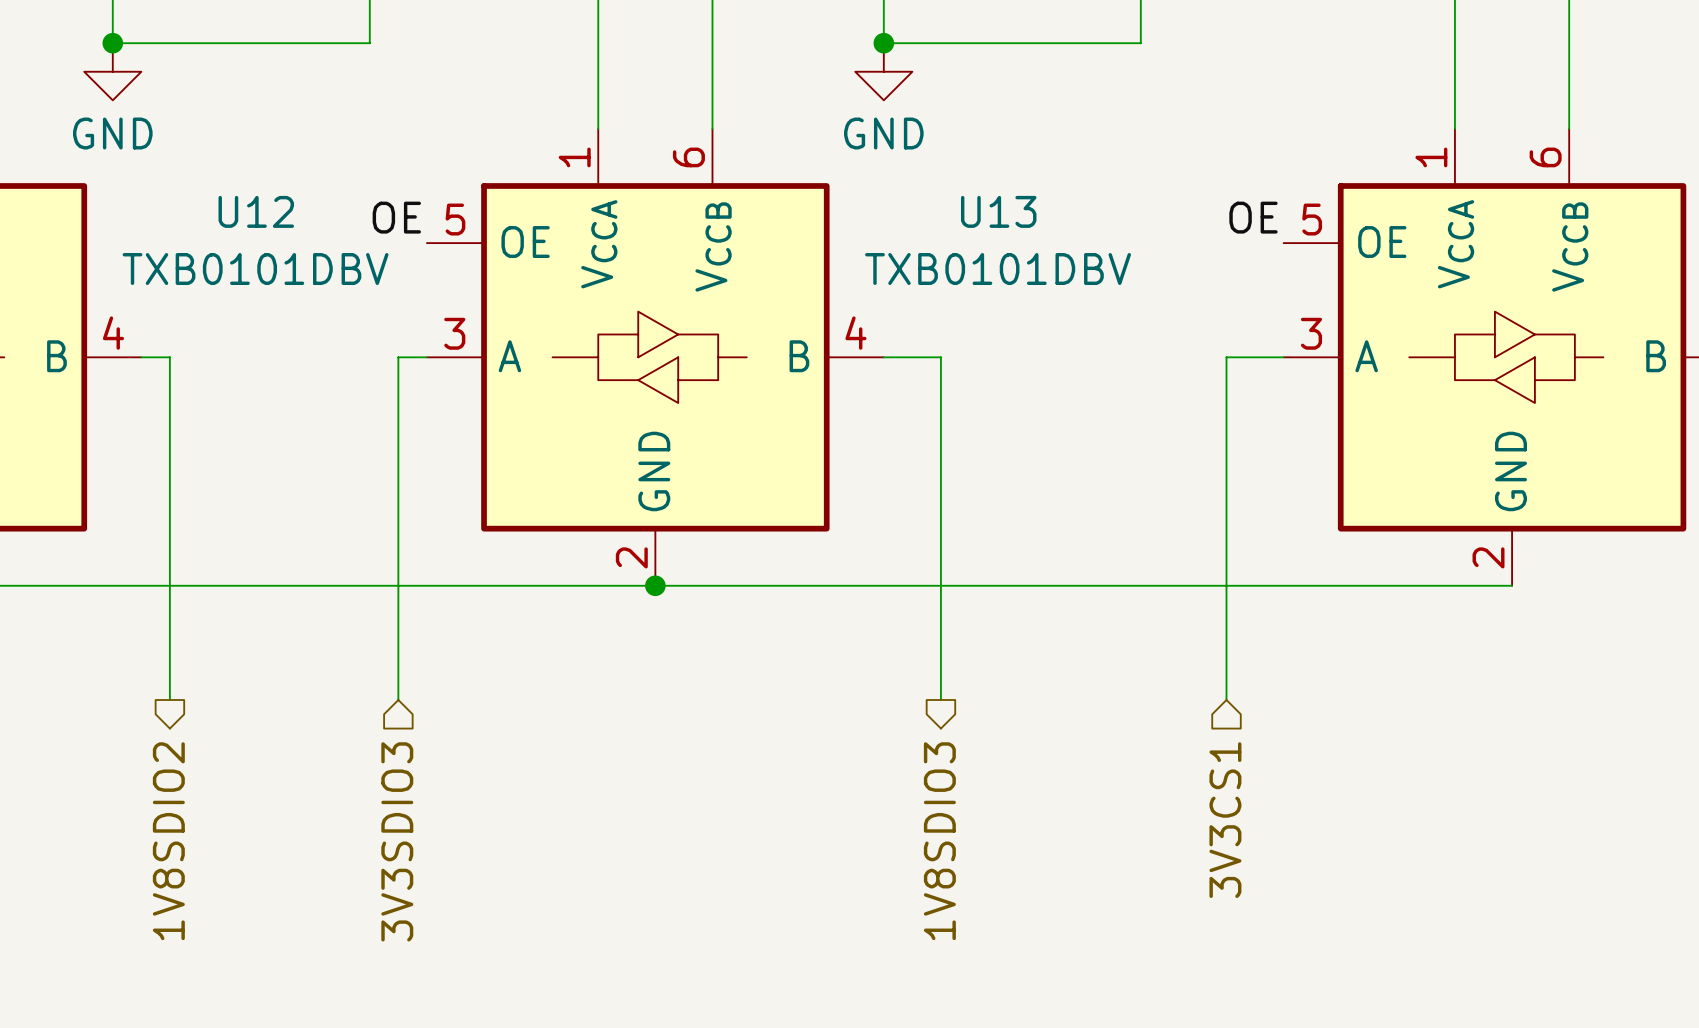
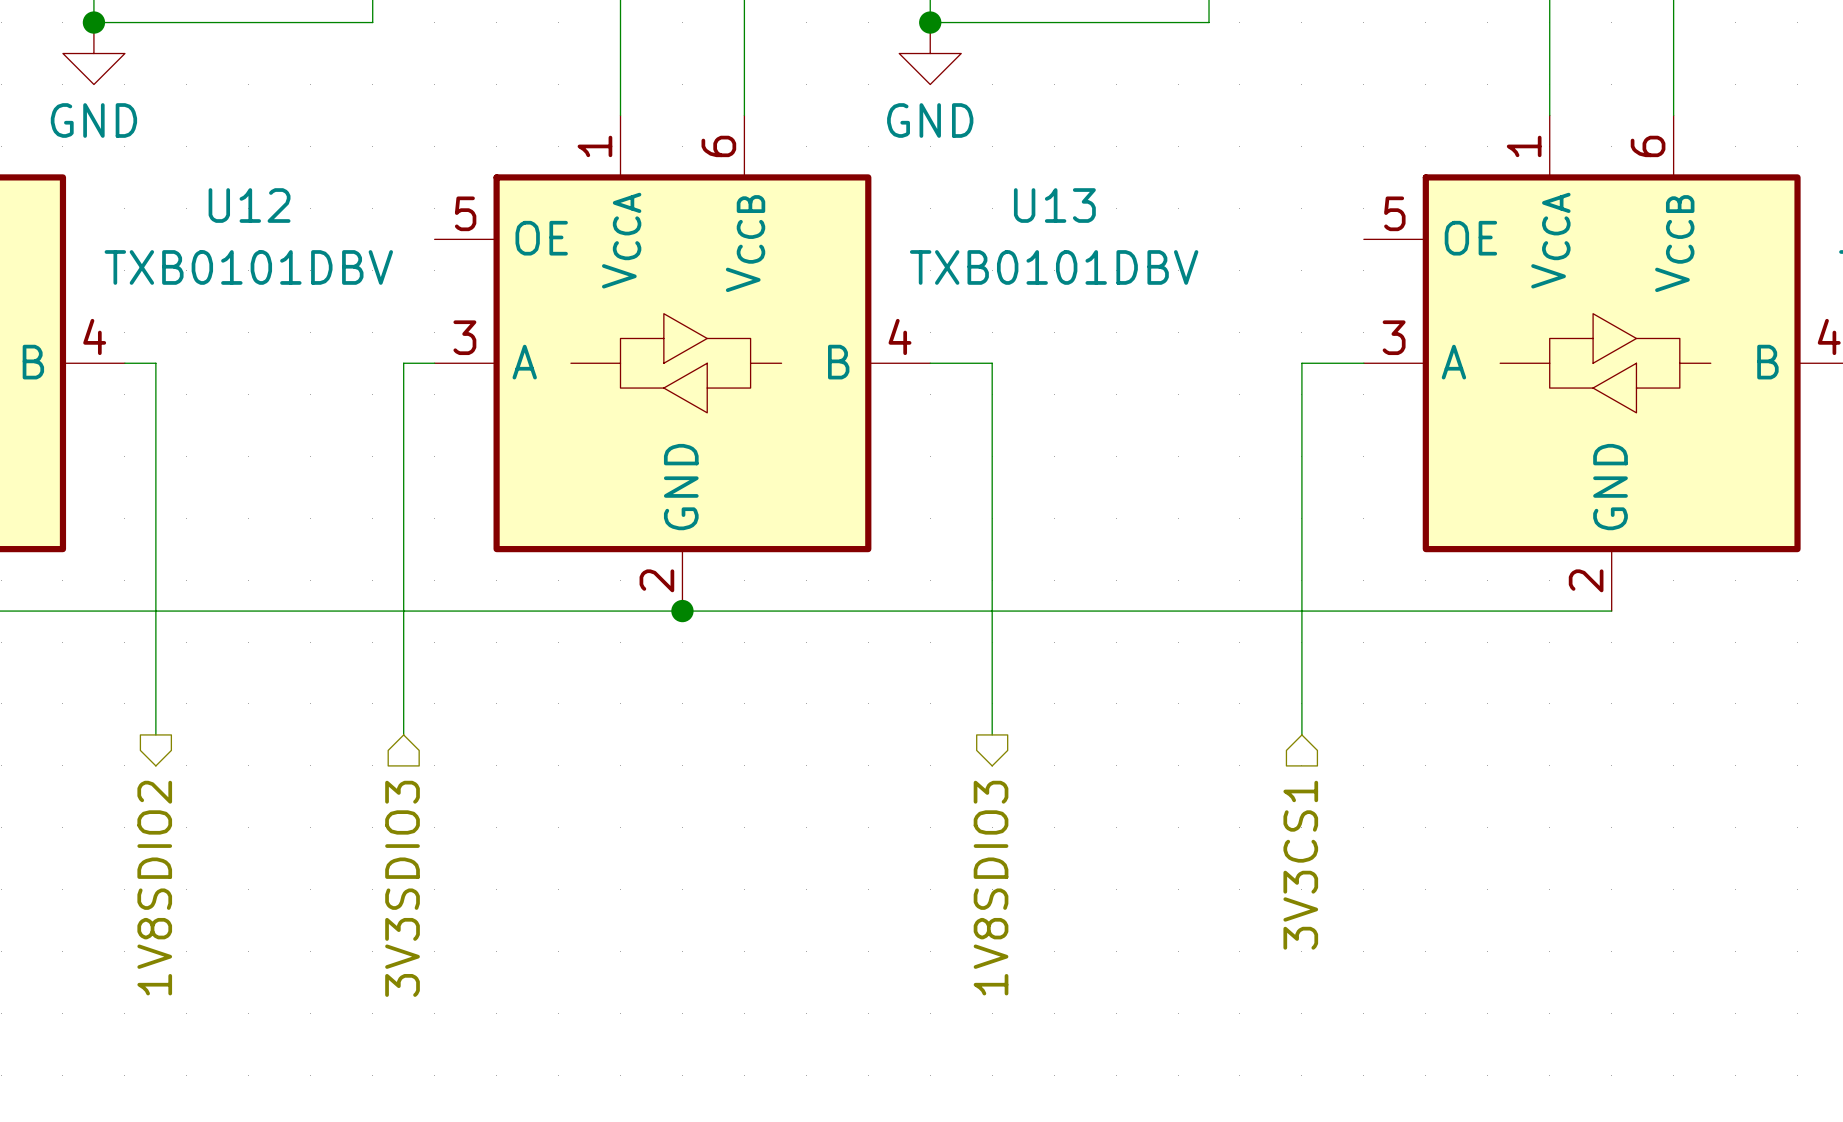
label: OE (396, 217) -> none
label: OE (1253, 217) -> none

